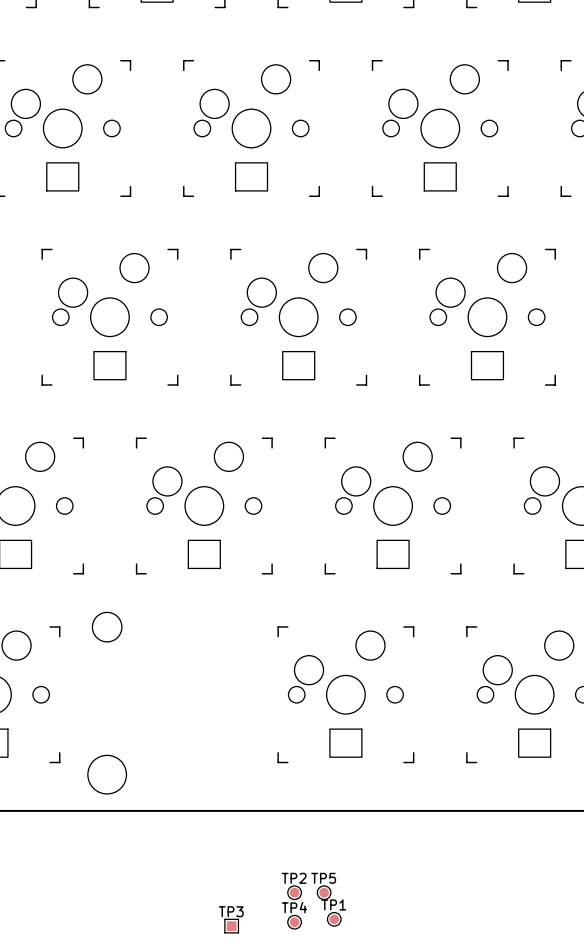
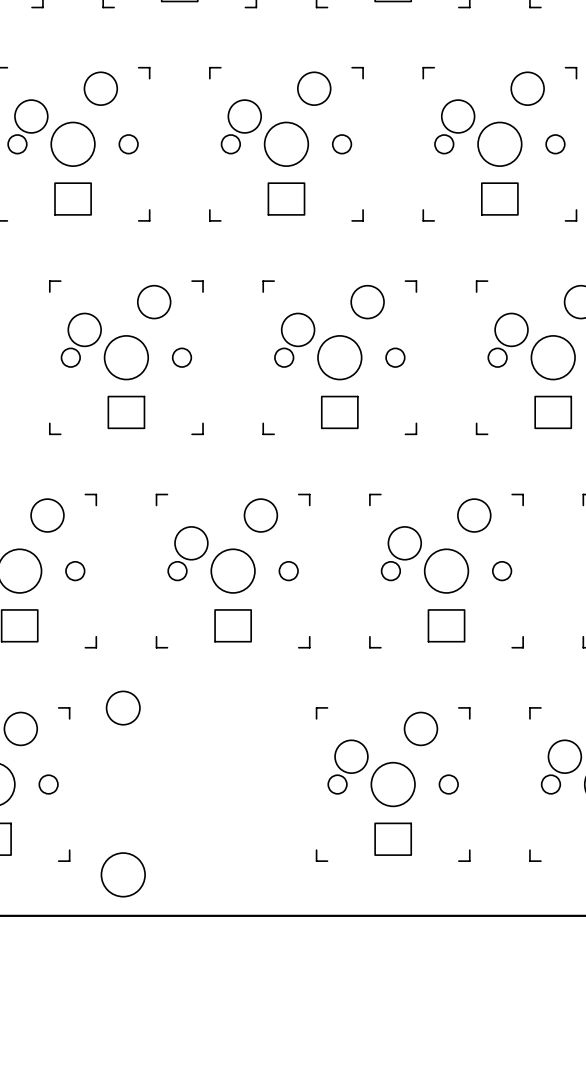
TP2: (294, 892) -> none
TP5: (324, 892) -> none
TP1: (334, 919) -> none
TP4: (294, 922) -> none
TP3: (231, 926) -> none

